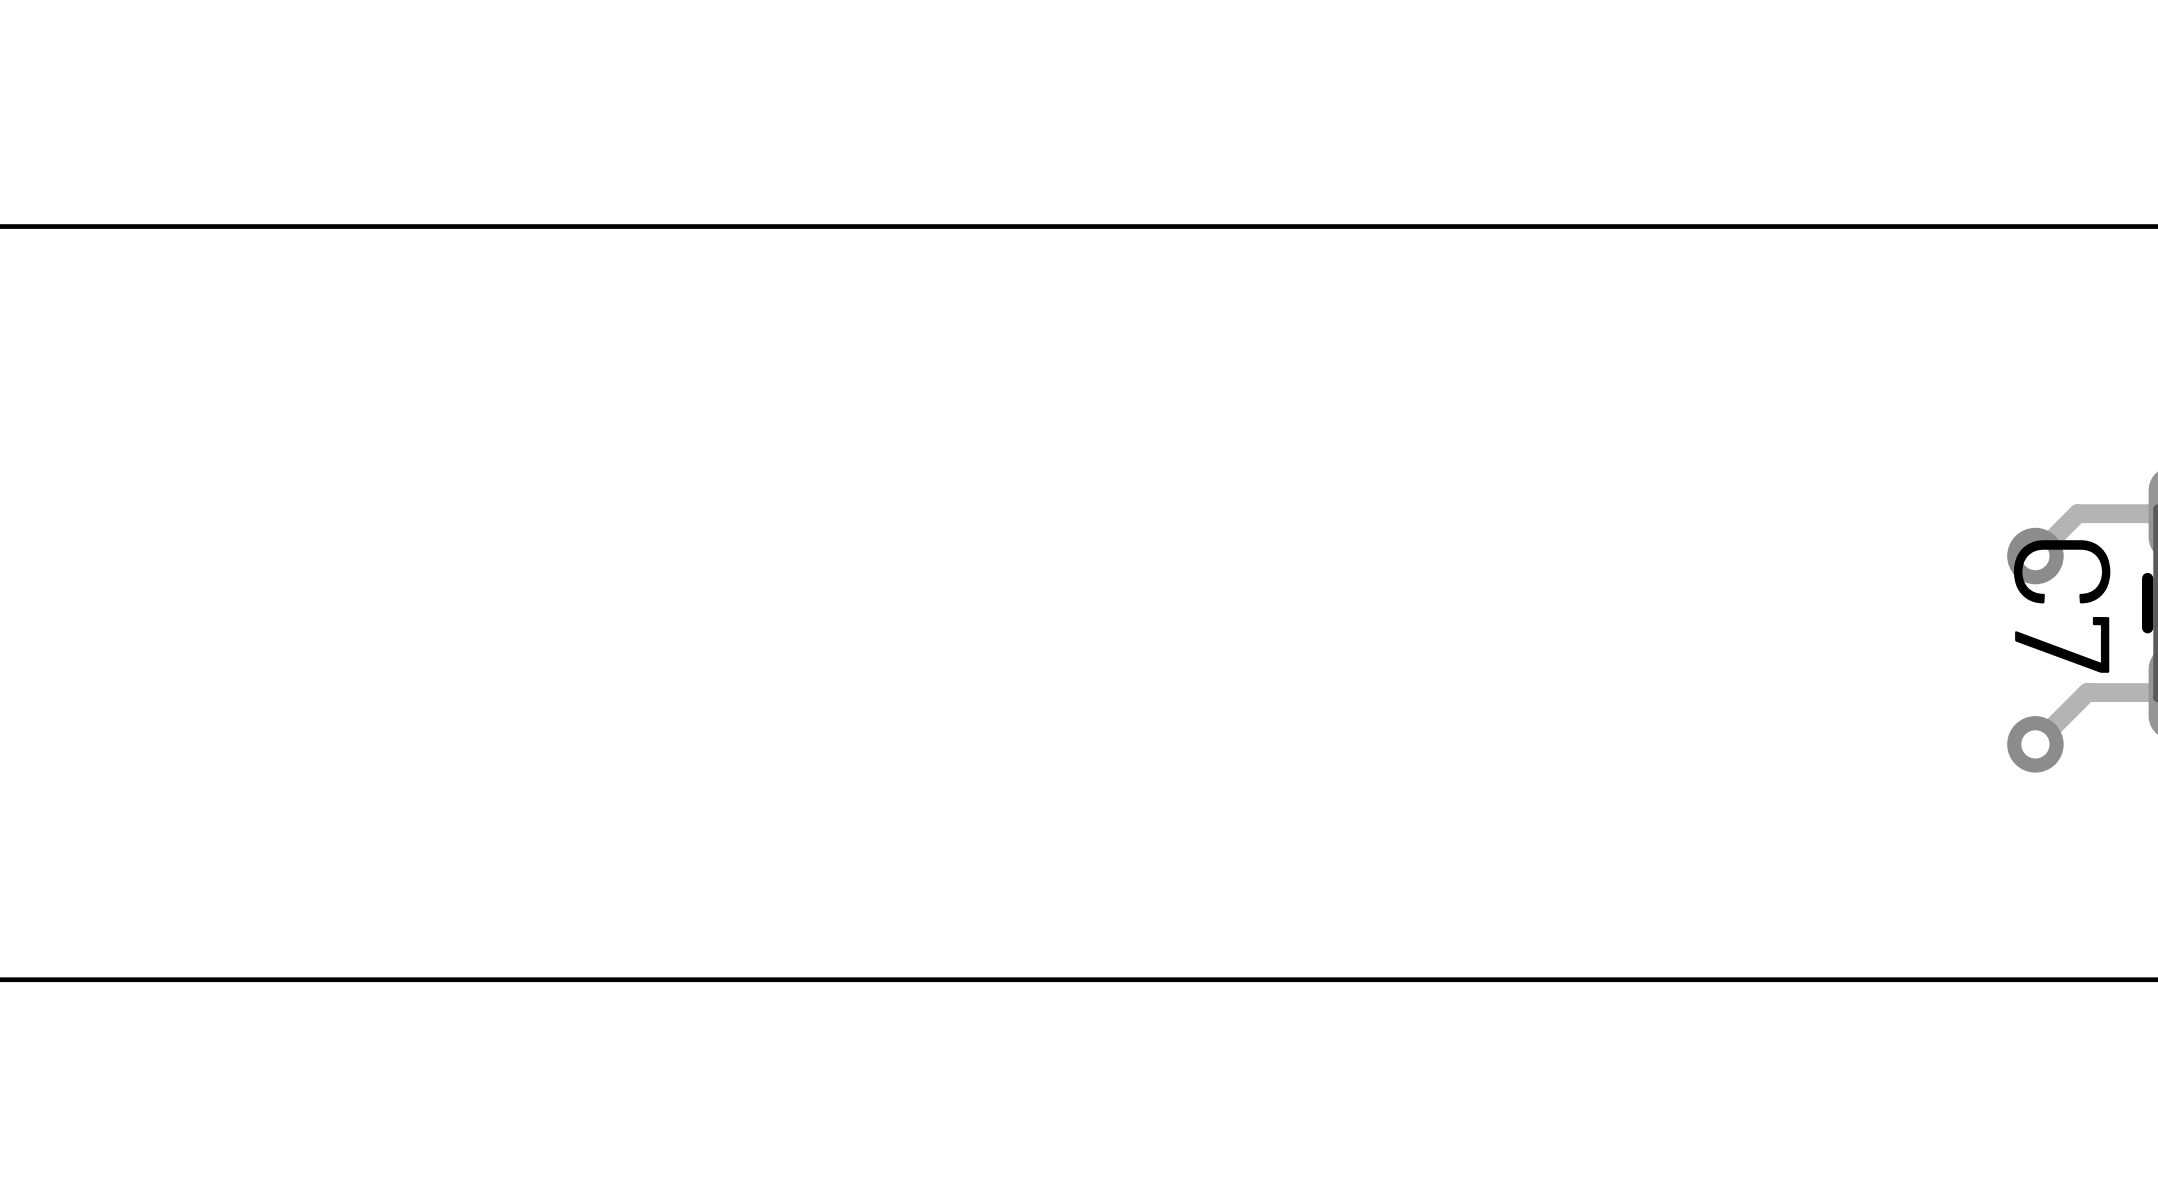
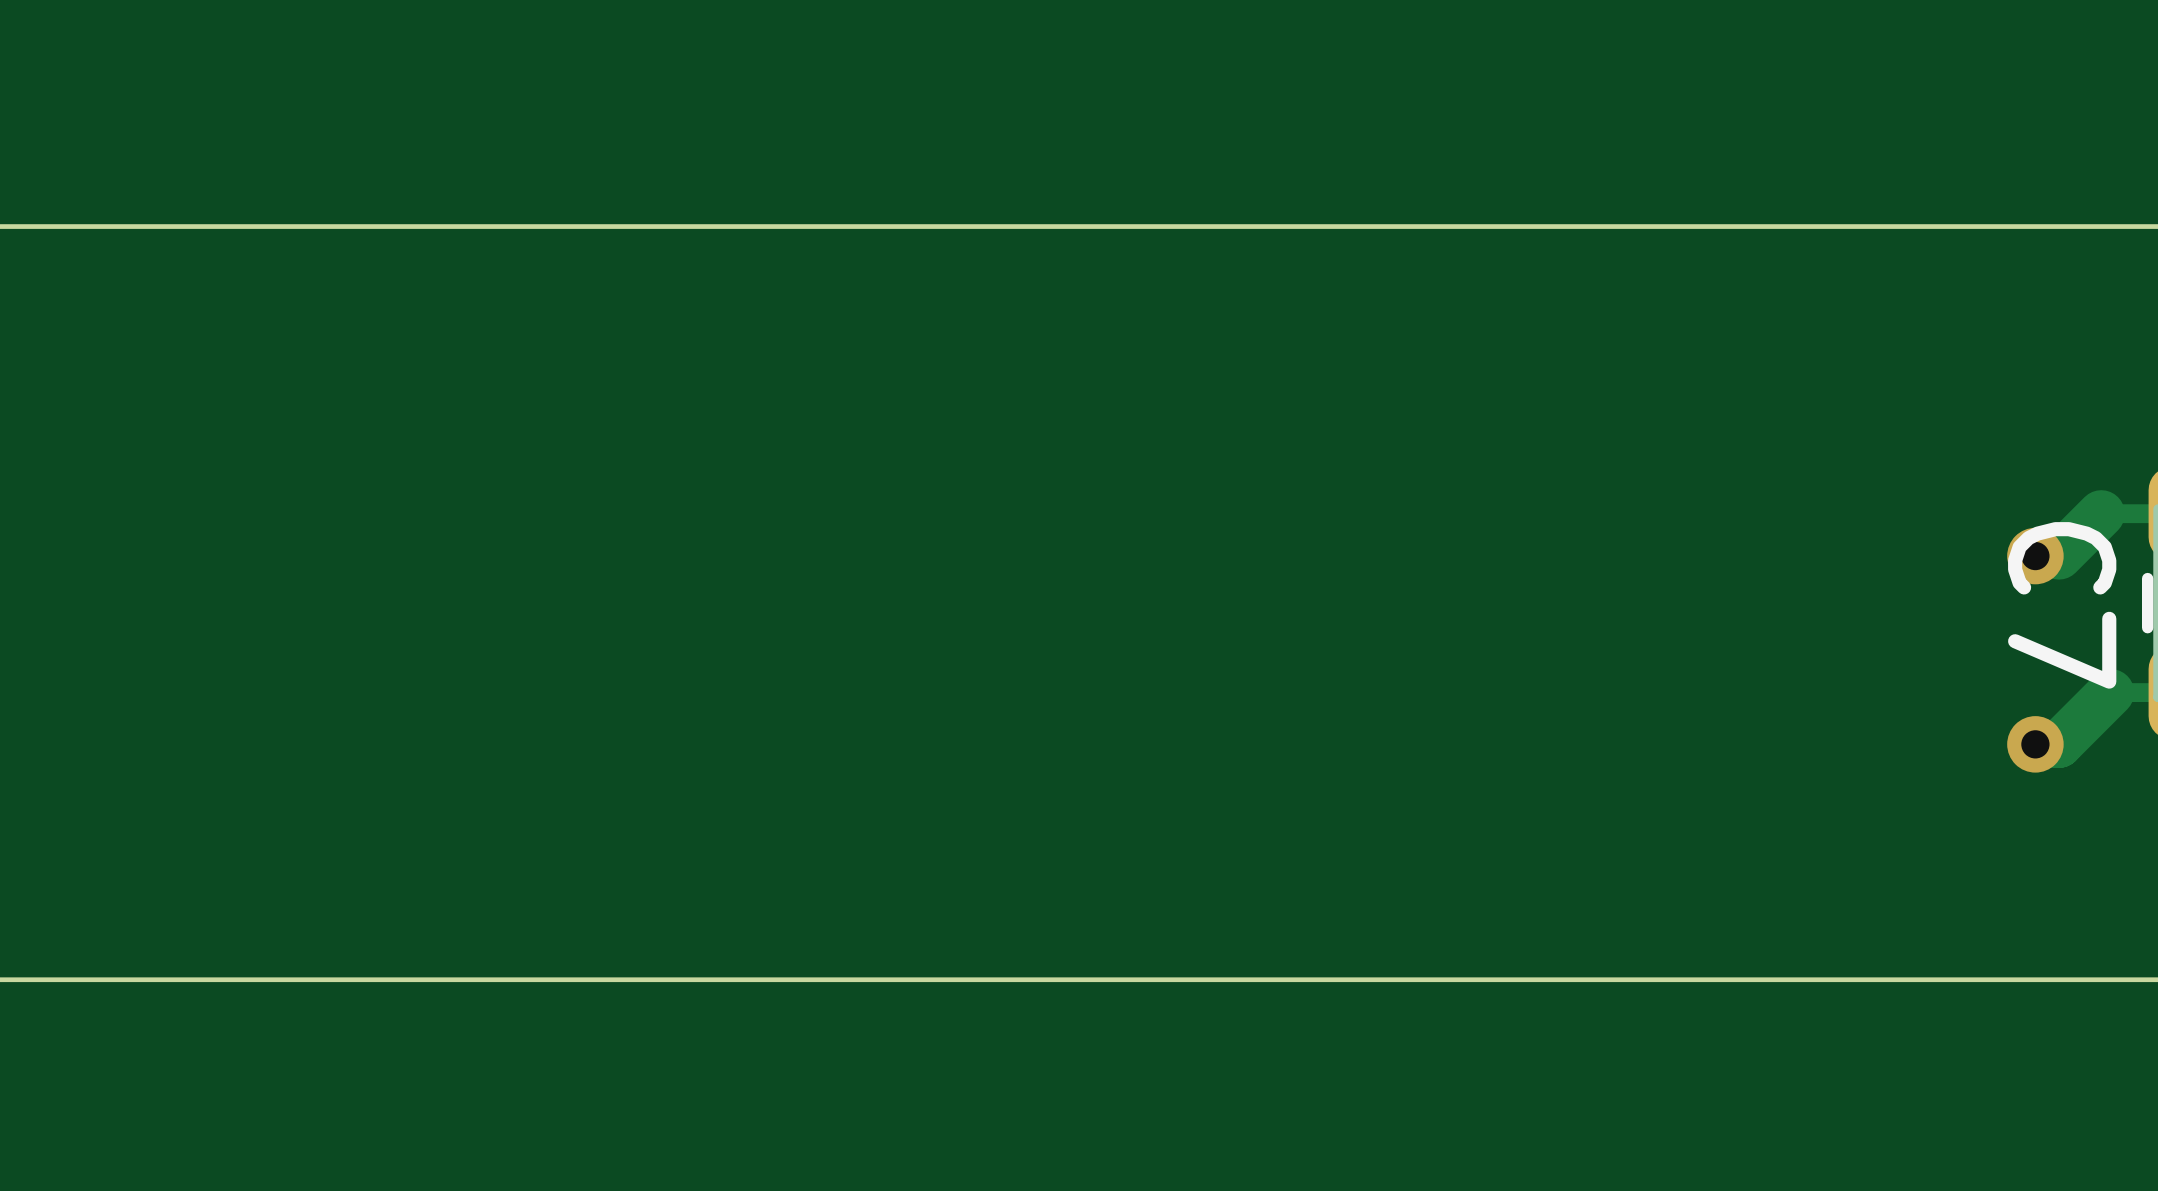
track: (2101, 513) (2077, 513) (2035, 556) -> (2101, 513) (2058, 556) (2035, 556)
track: (2110, 692) (2087, 692) (2035, 744) -> (2110, 692) (2058, 744) (2035, 744)

